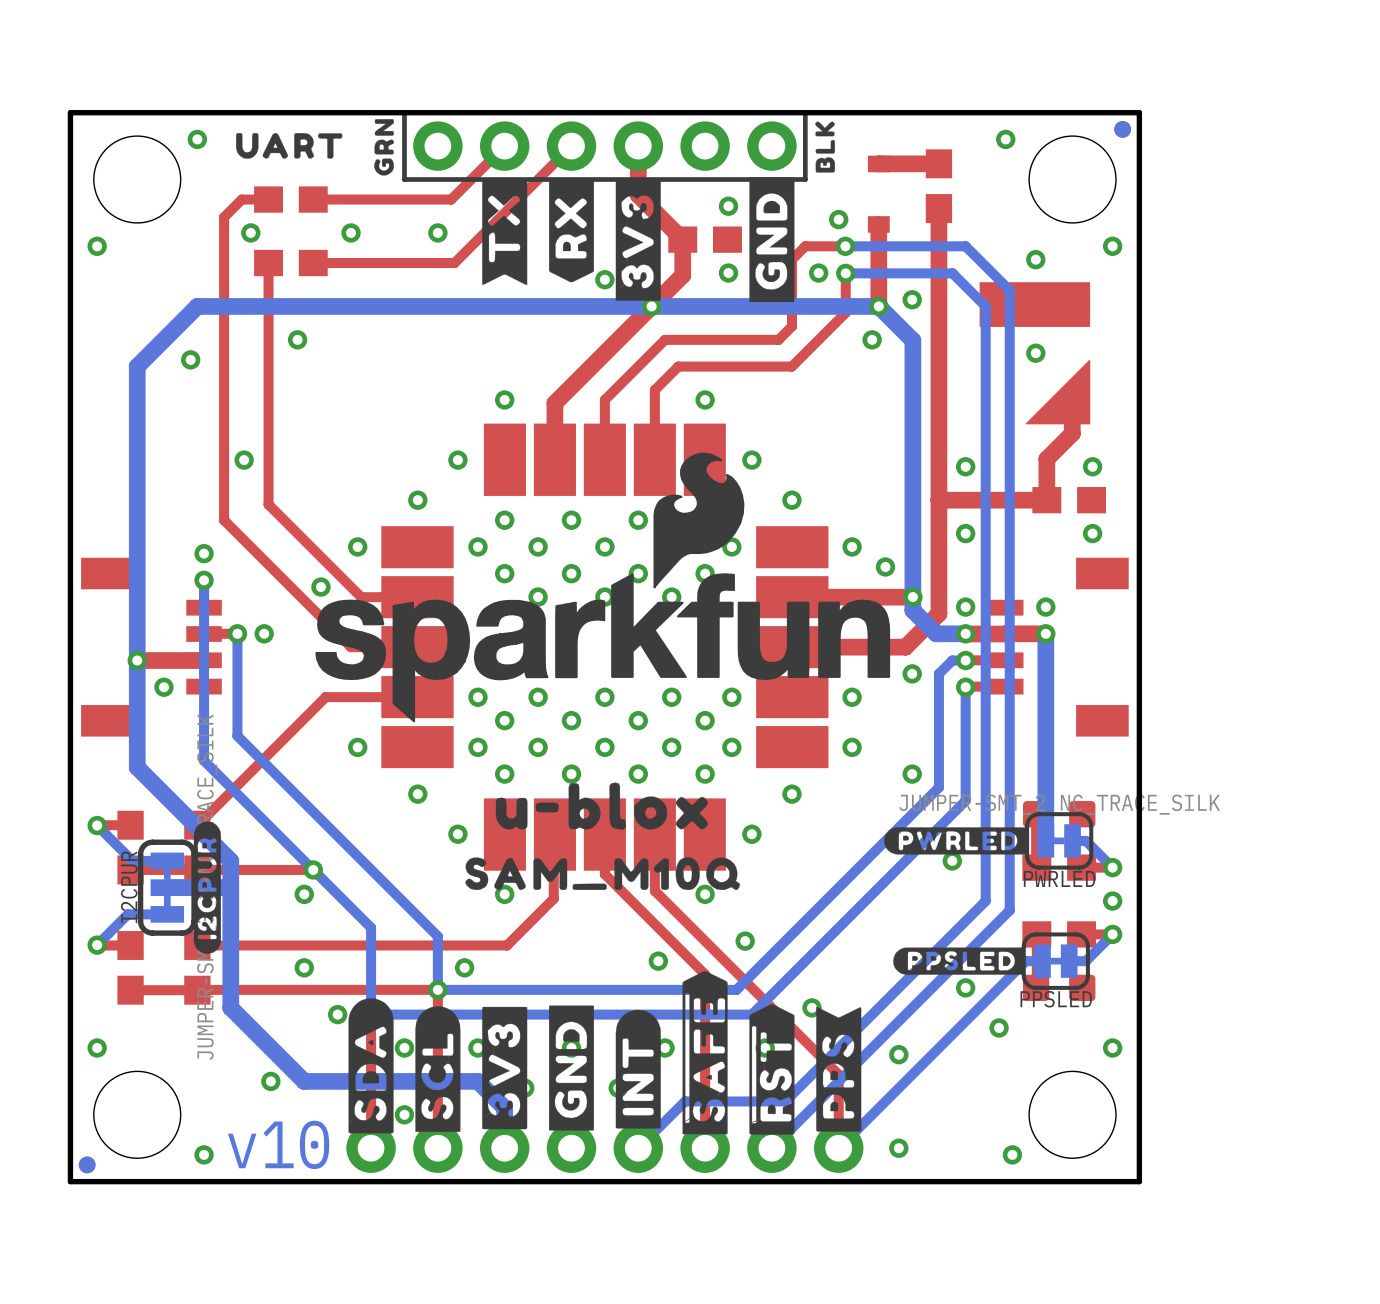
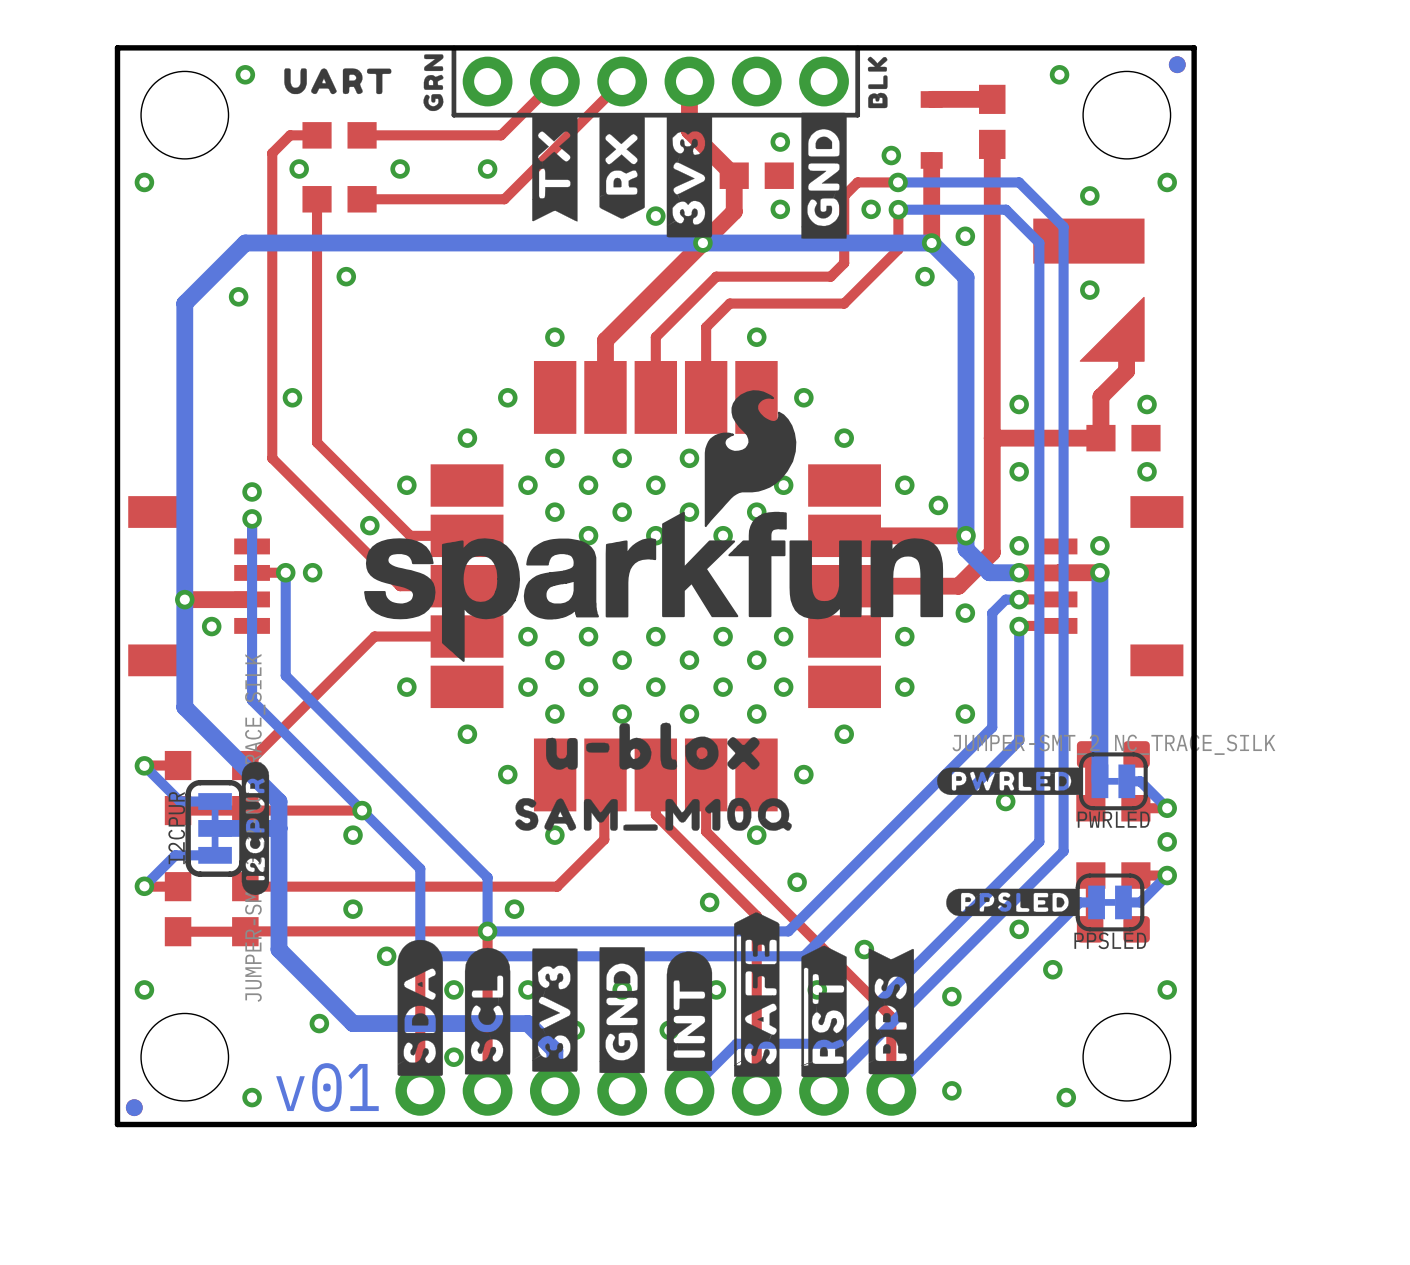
text: v10 (278, 1144) -> v01 (327, 1087)

